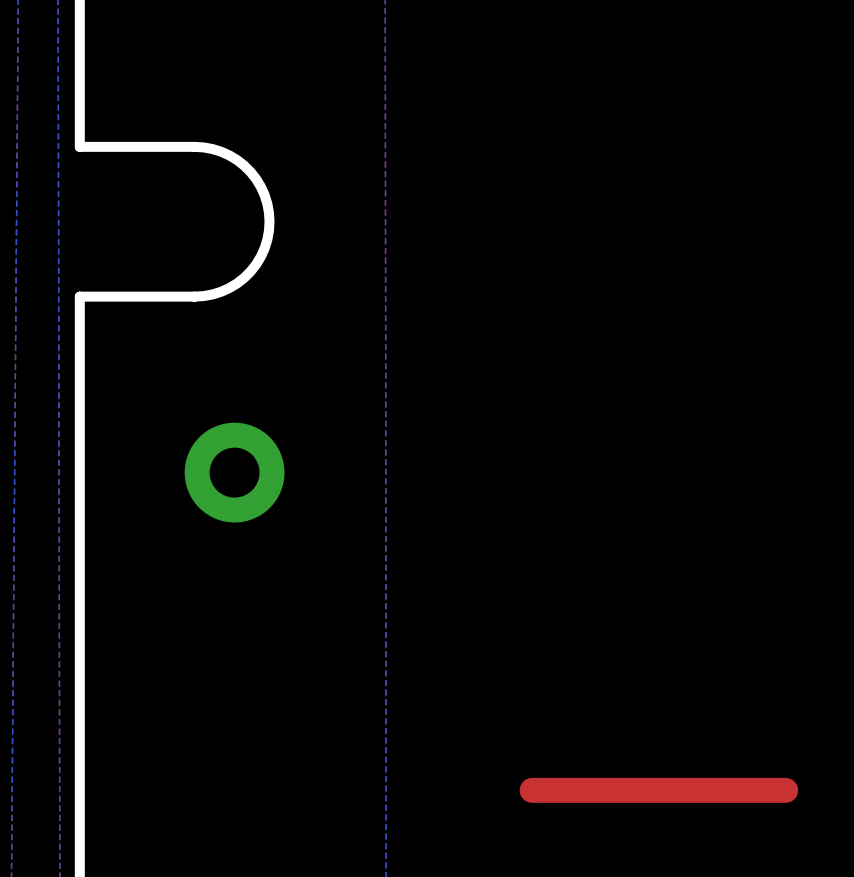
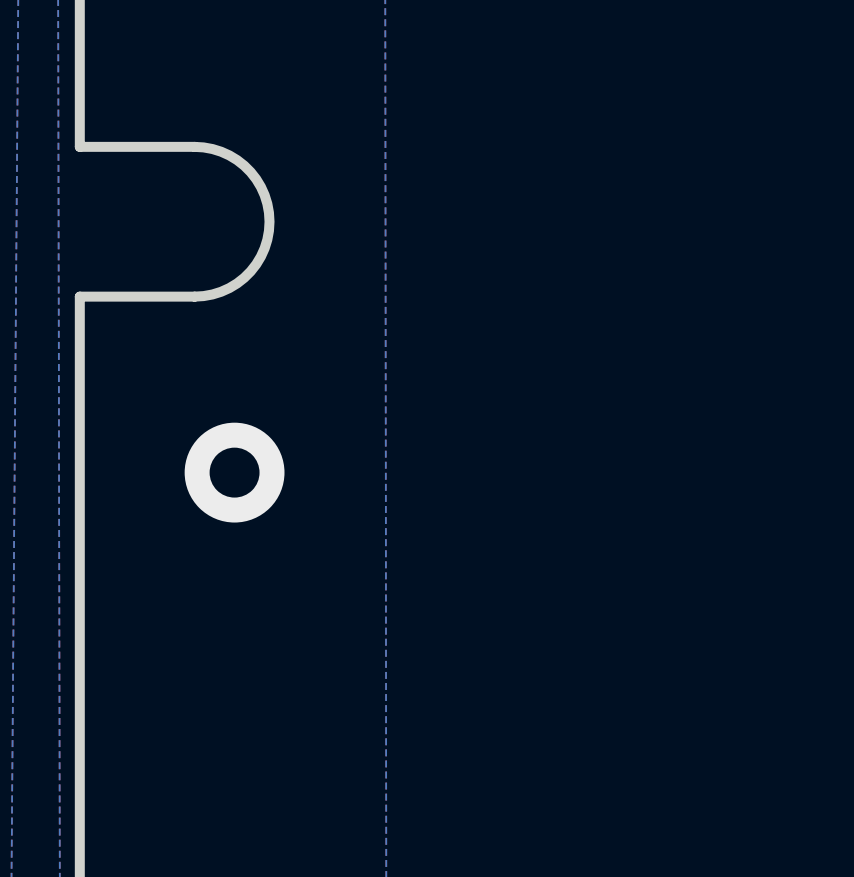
top track: (785, 790) (532, 790) -> none

